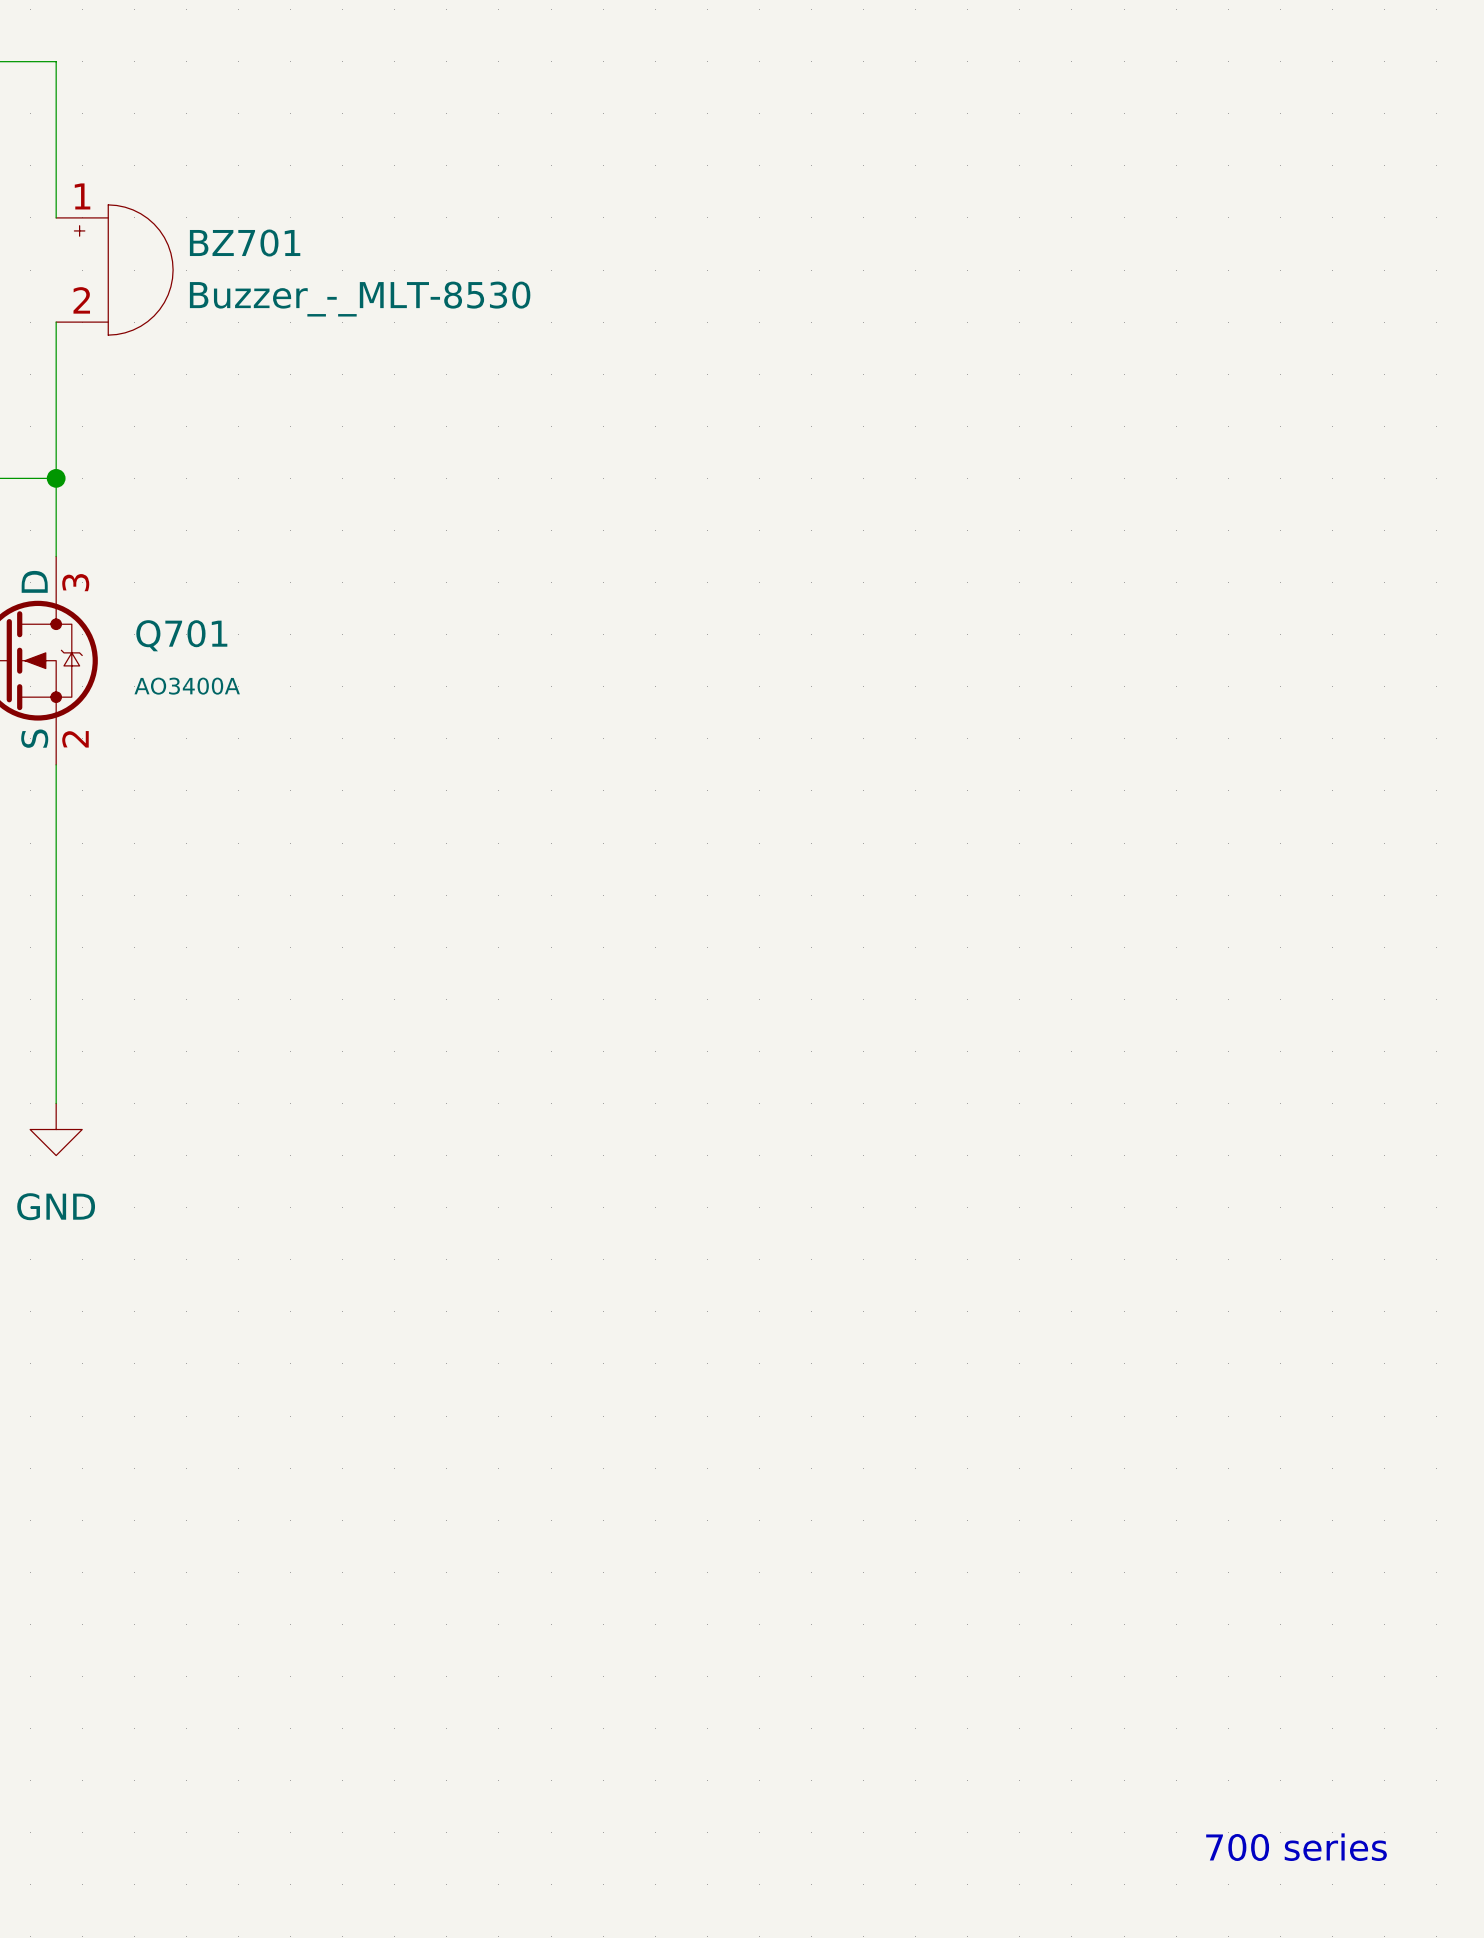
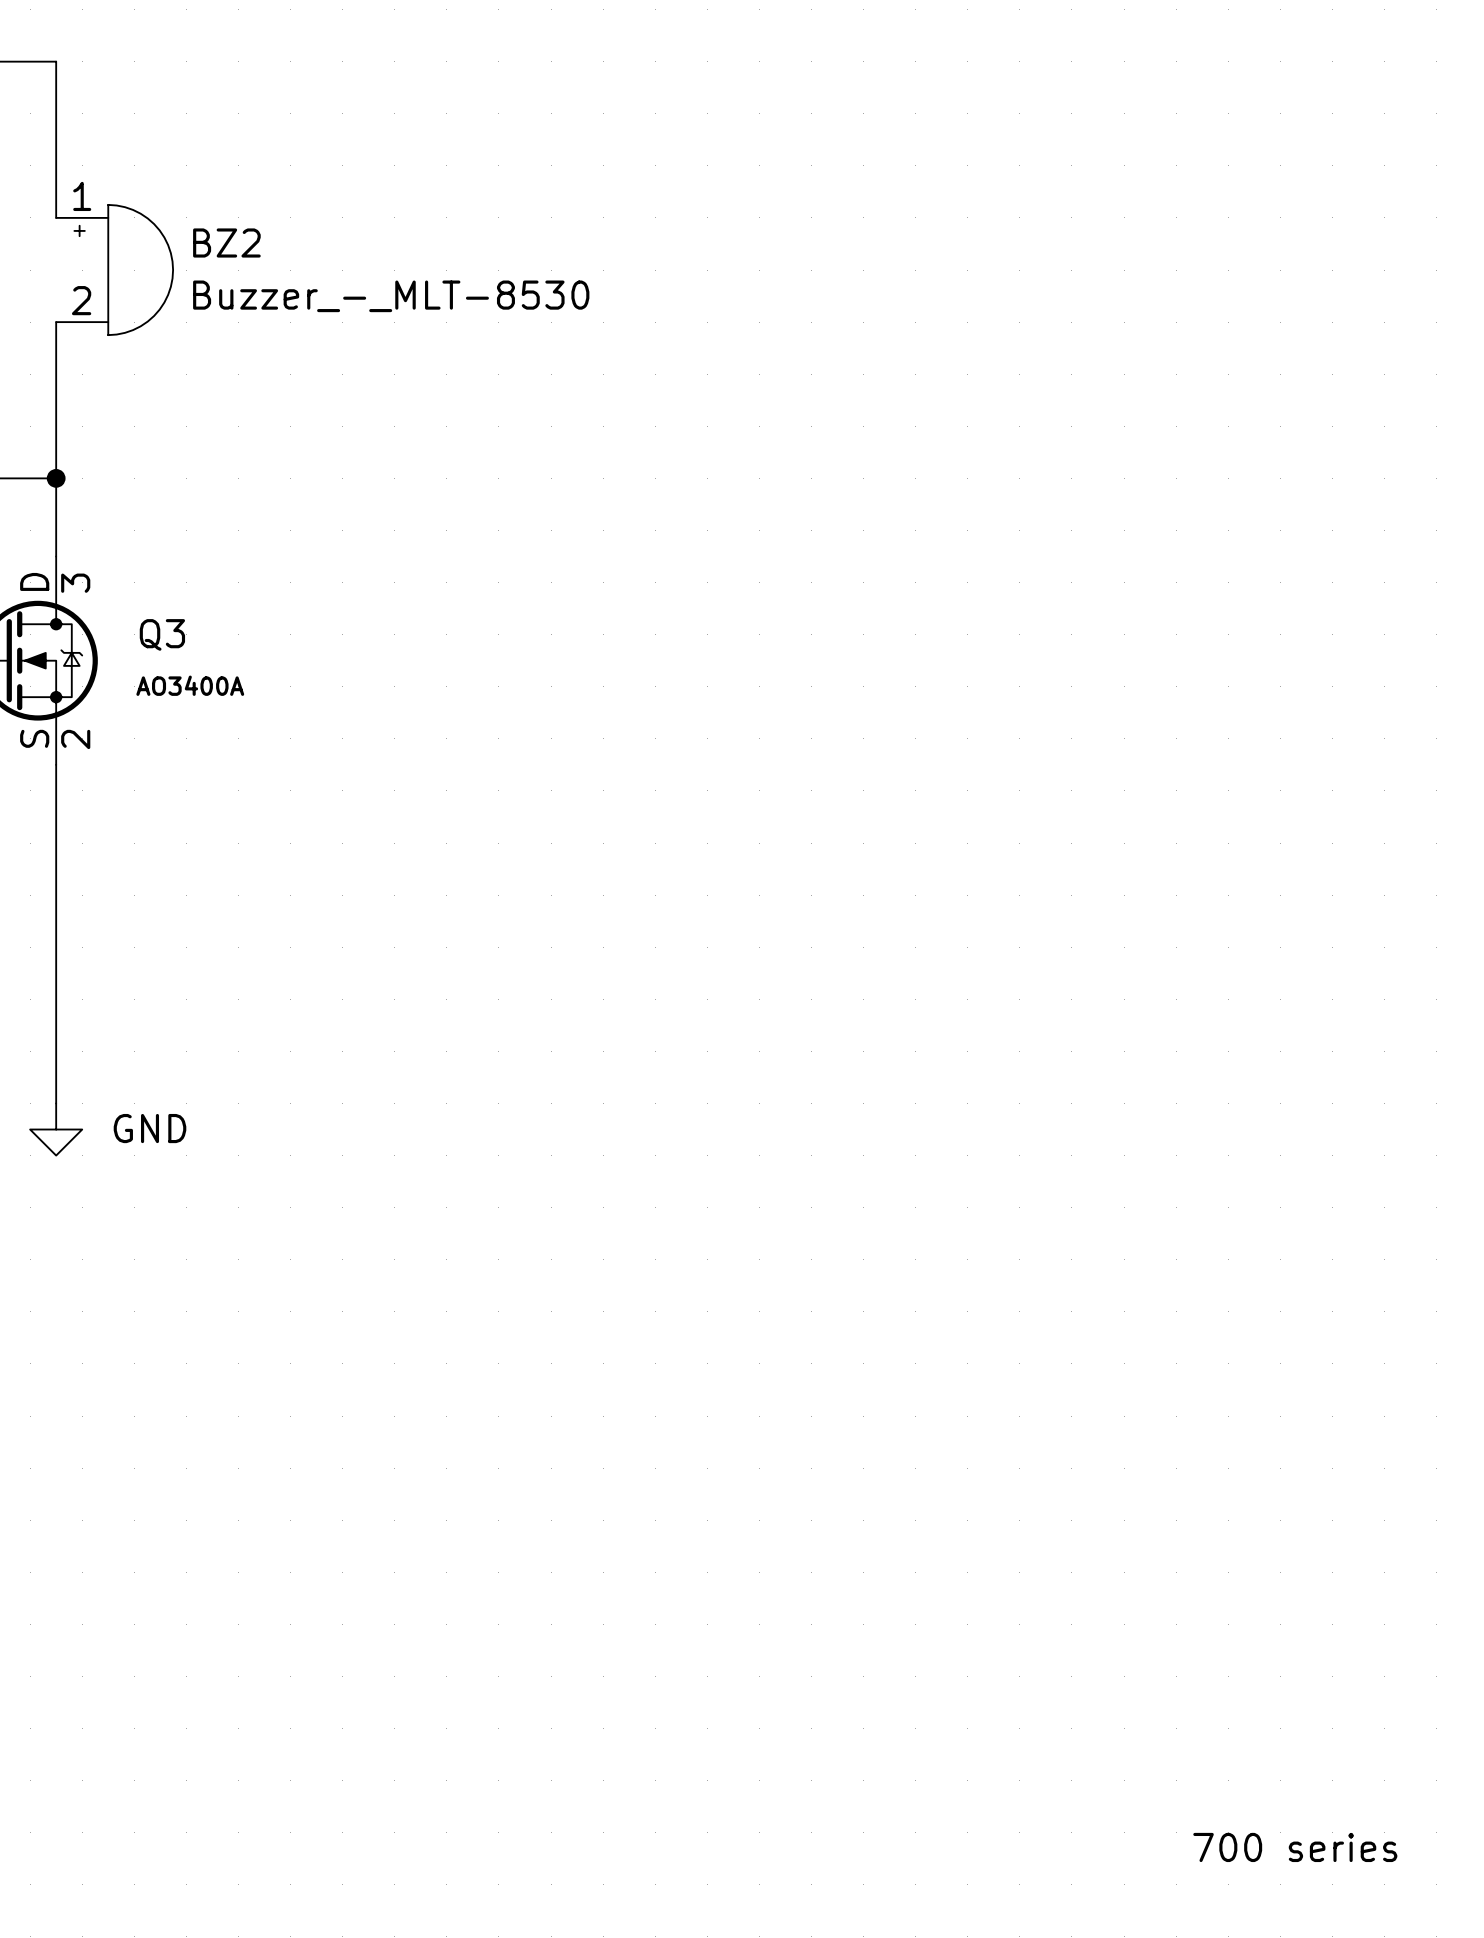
BZ701 name: BZ701 (245, 243) -> BZ2 (226, 242)
Q701 name: Q701 (181, 635) -> Q3 (162, 634)
power symbol text position: GND (56, 1206) -> GND (150, 1128)

